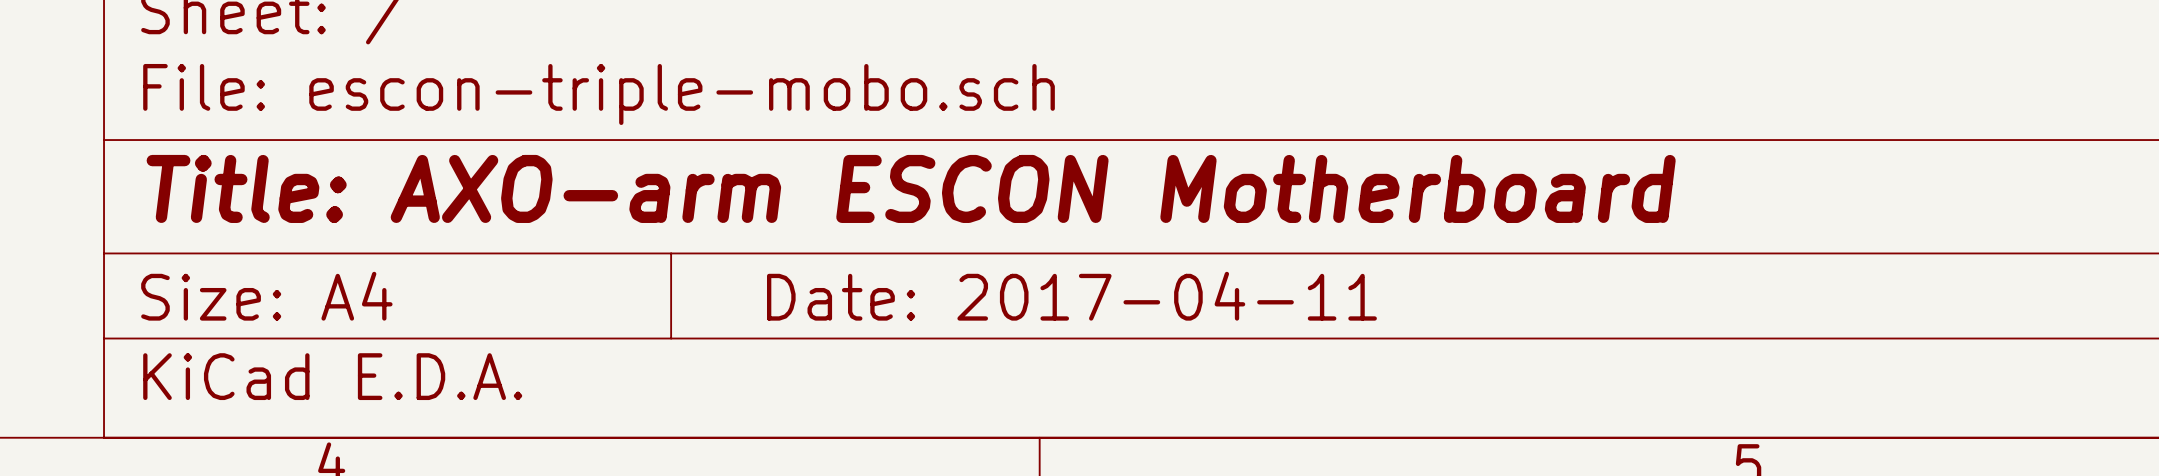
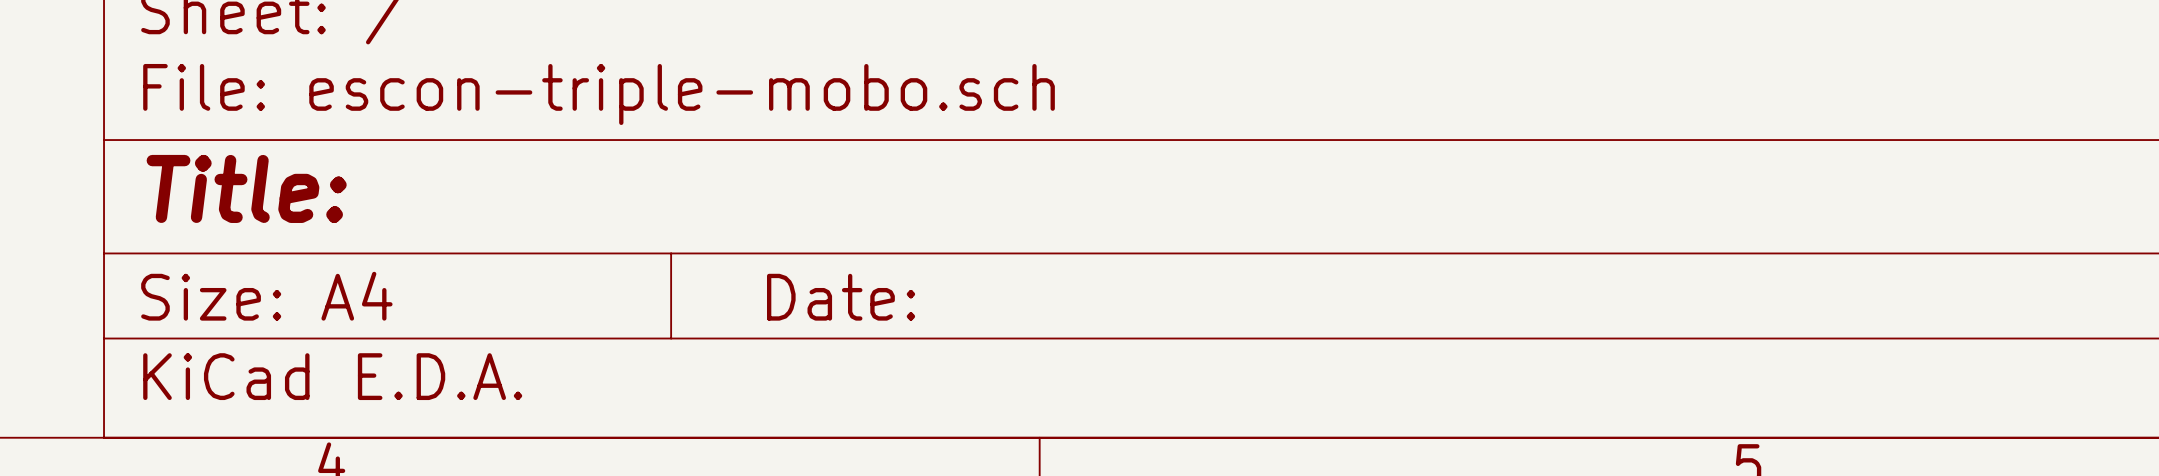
title block: Title: AXO-arm ESCON Motherboard (911, 188) -> Title: (246, 188)
title block: Date: 2017-04-11 (1071, 296) -> Date: (841, 297)

